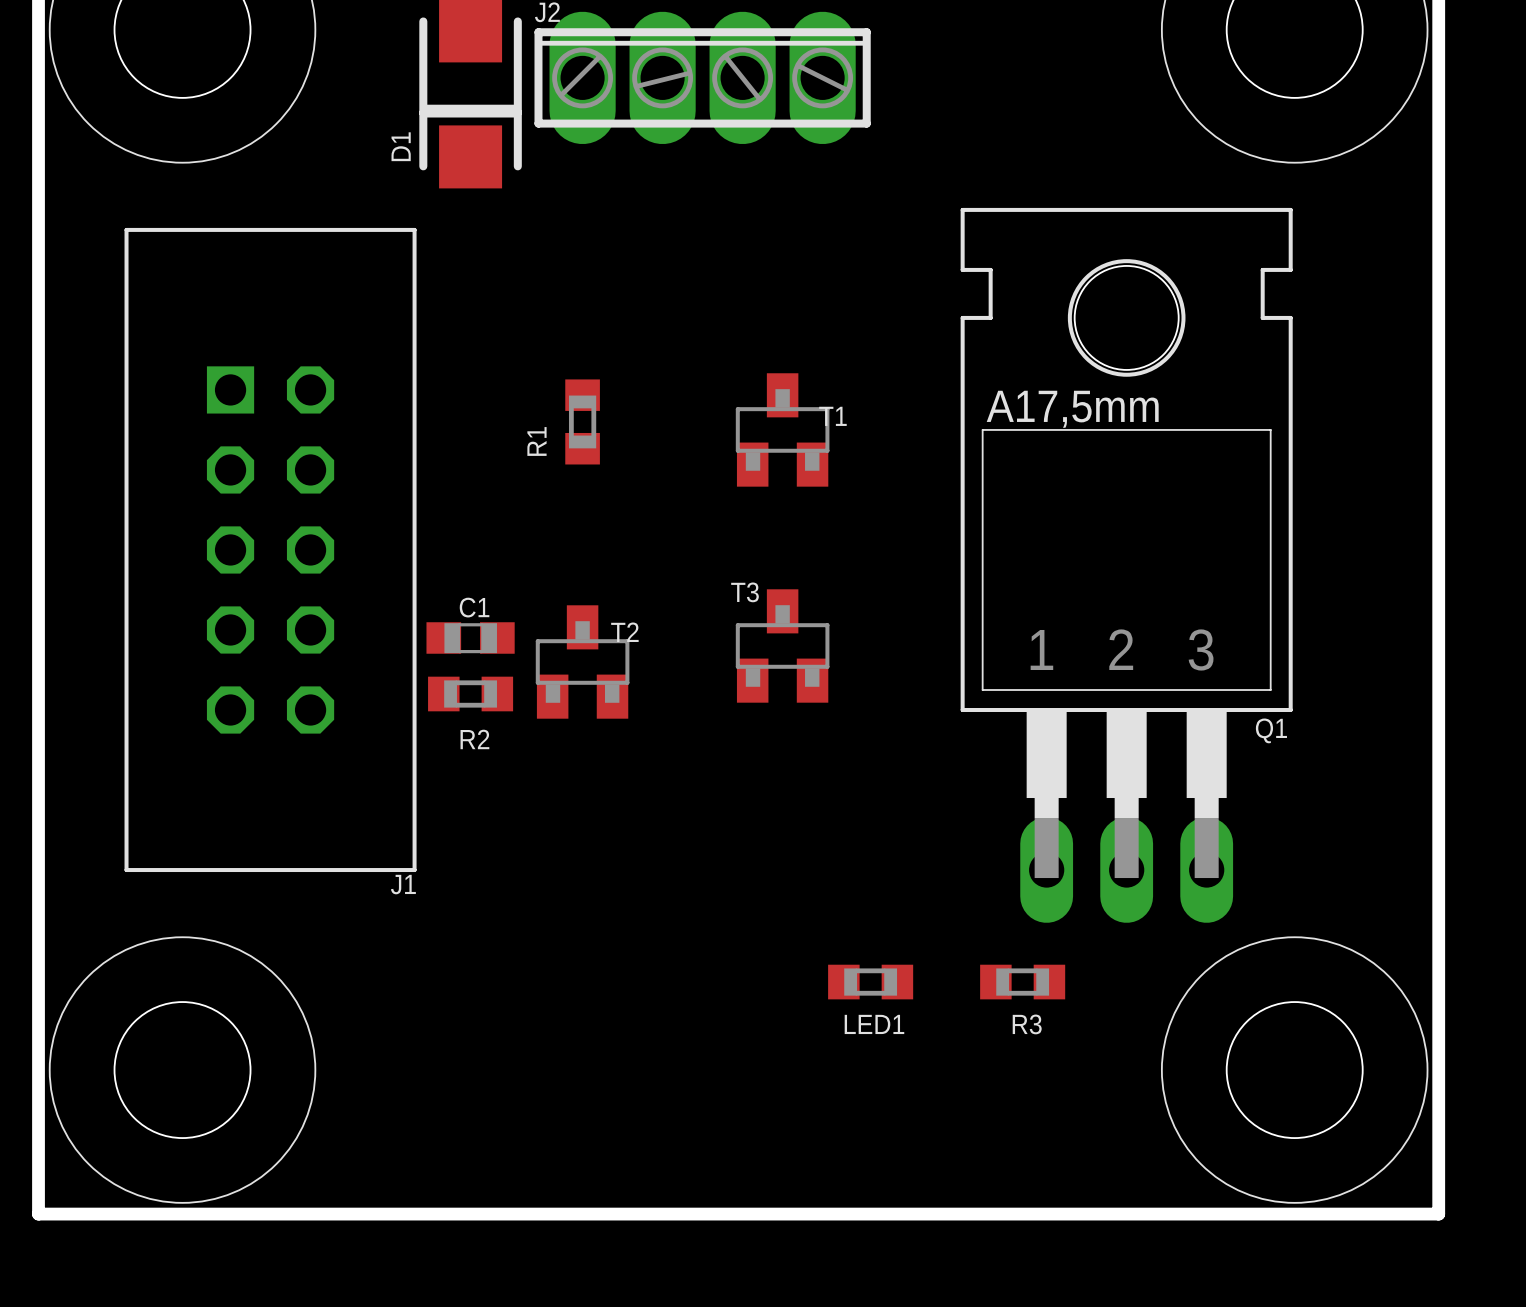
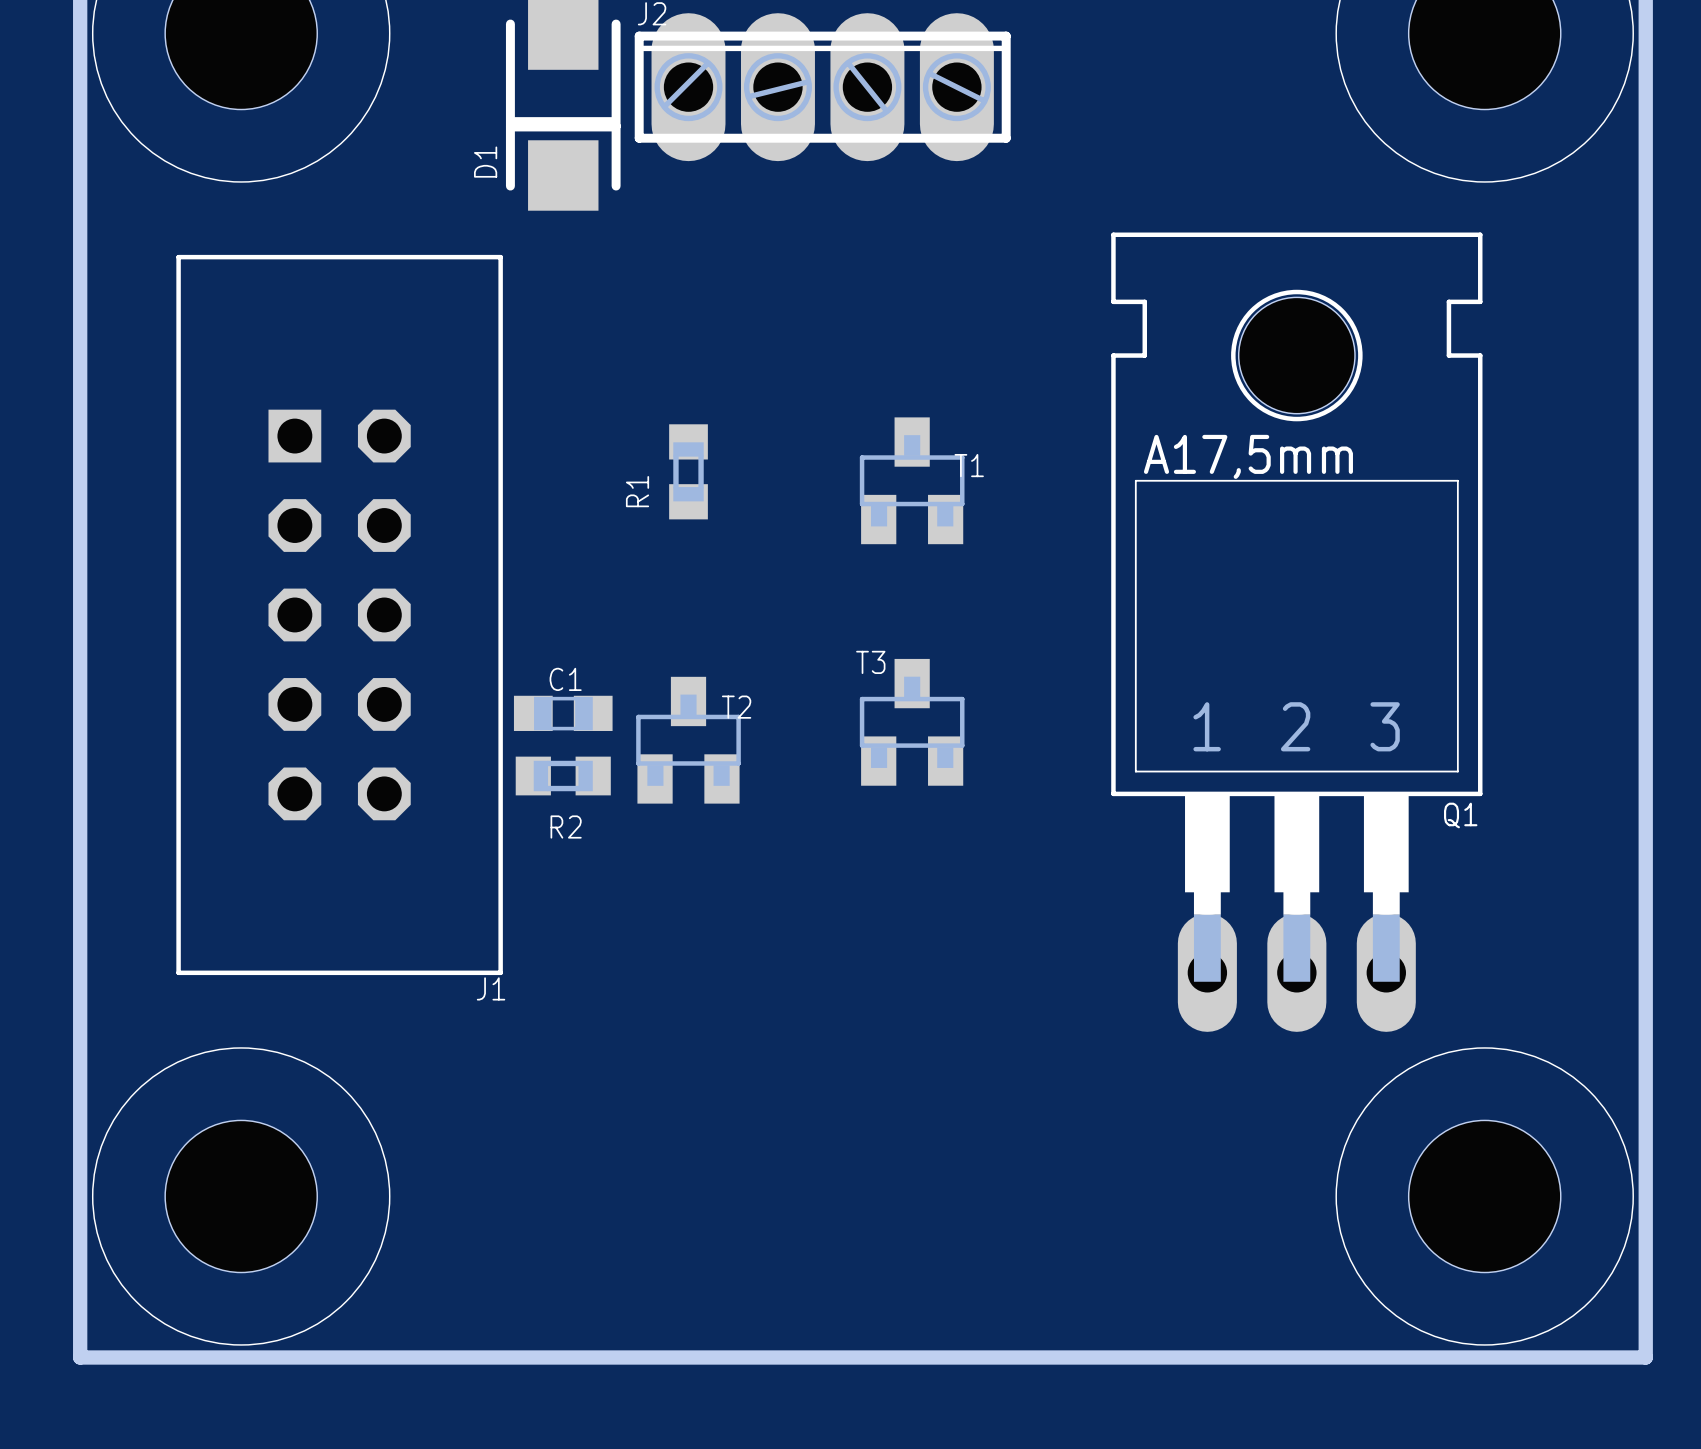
LED1: (870, 982) -> none
R3: (1022, 982) -> none

